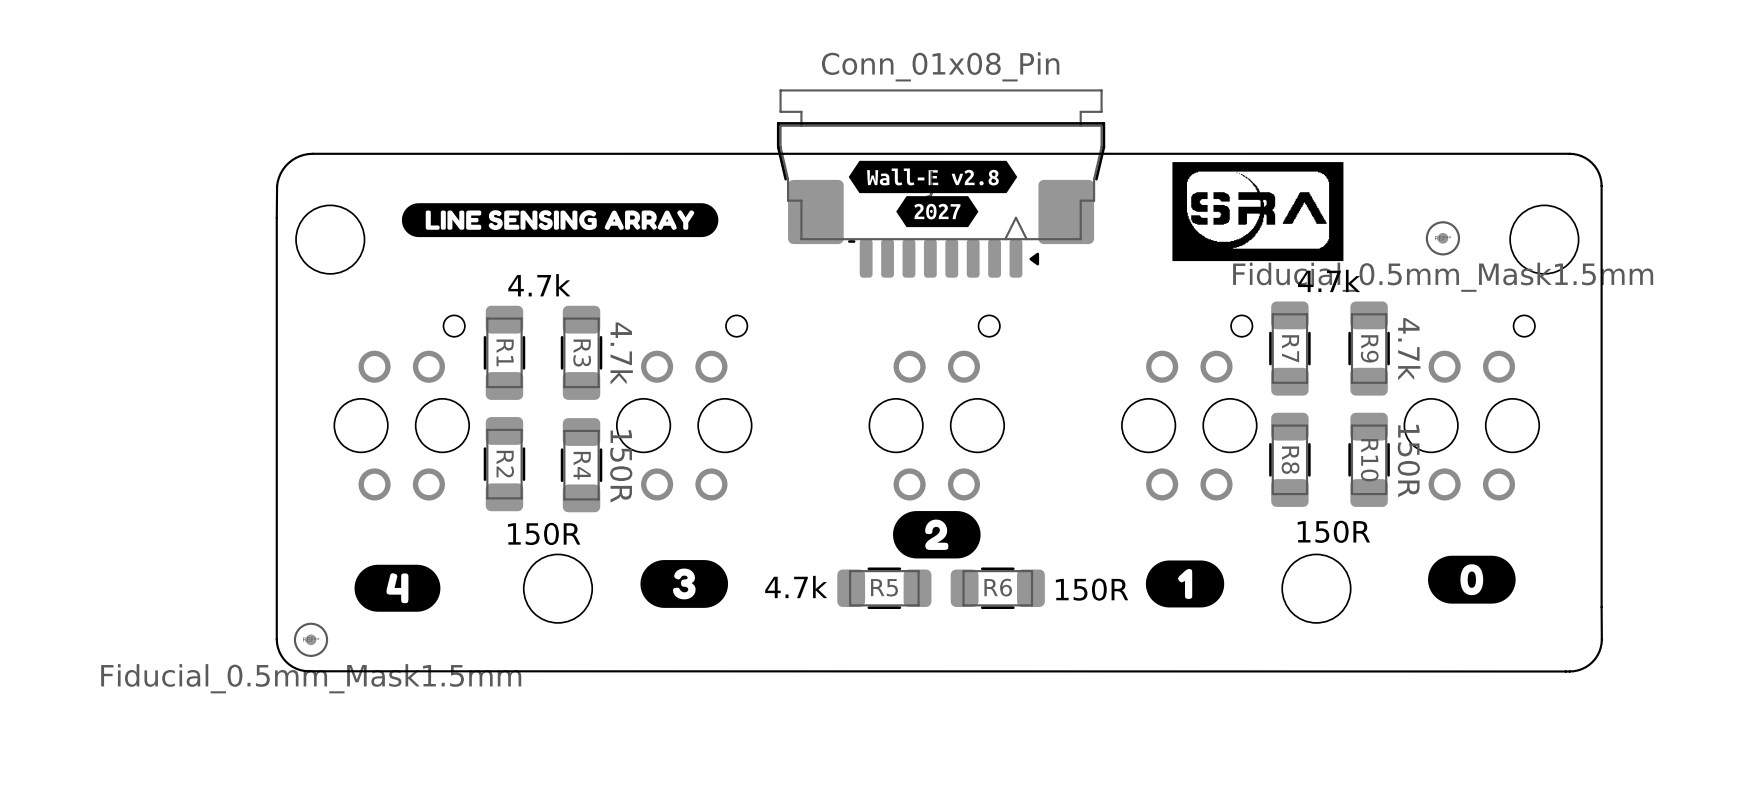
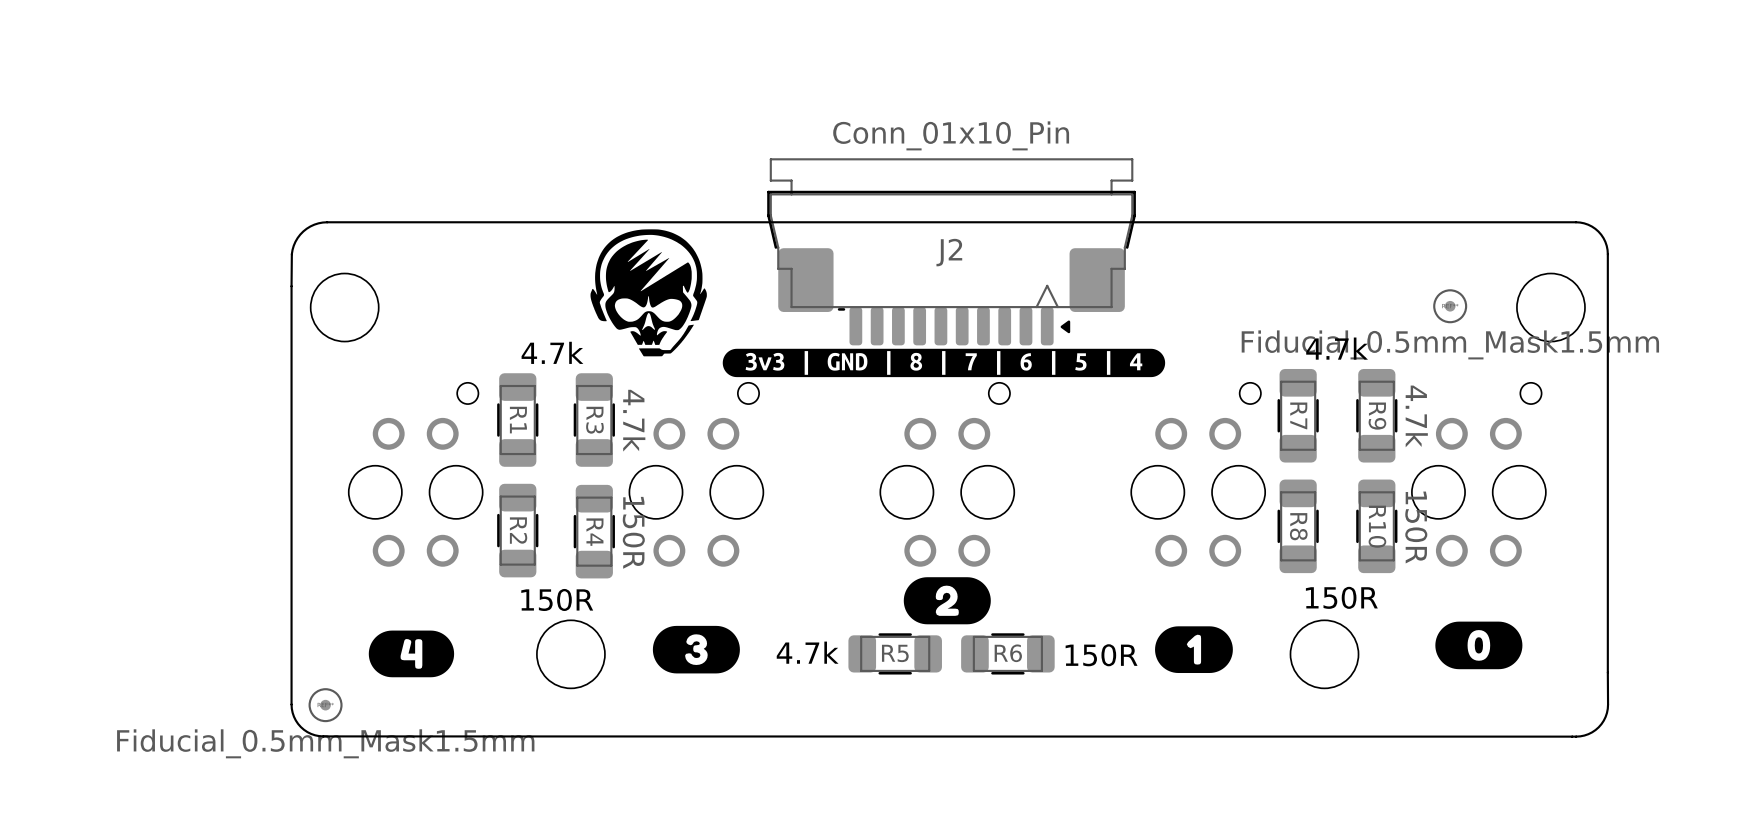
J2 value: Conn_01x08_Pin (940, 66) -> Conn_01x10_Pin (951, 135)
J2 footprint: [776, 89, 1106, 278] -> [767, 158, 1136, 346]
drawing: none -> [590, 229, 1166, 378]
drawing: [848, 160, 1018, 228] -> none
drawing: [1172, 162, 1344, 262] -> none
drawing: [401, 203, 719, 238] -> none

